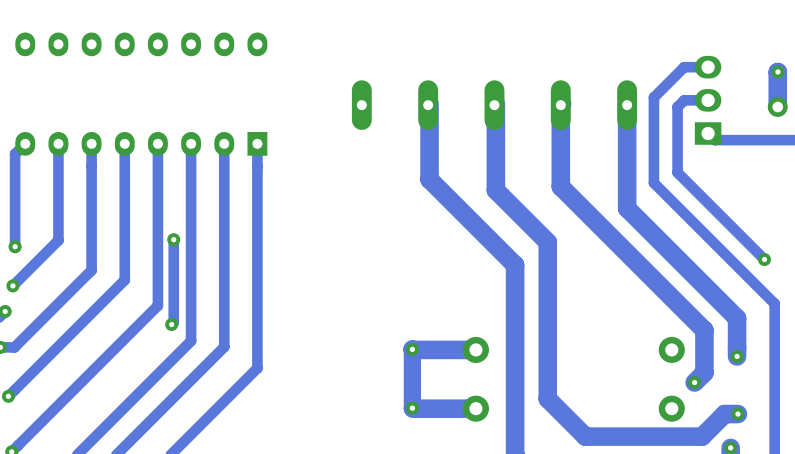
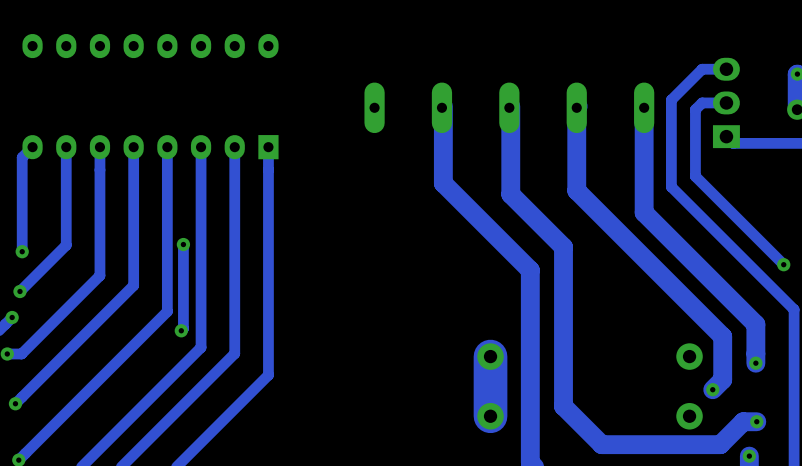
via: (412, 349) -> none
track: (475, 349) (412, 349) (412, 408) (475, 408) -> (490, 356) (490, 416)
via: (412, 408) -> none

